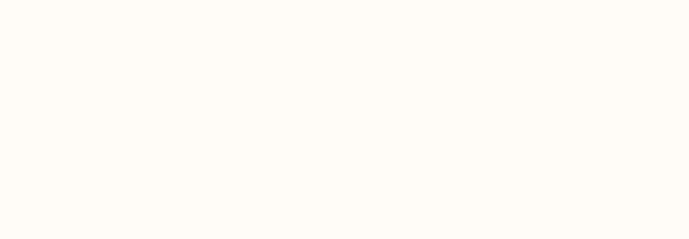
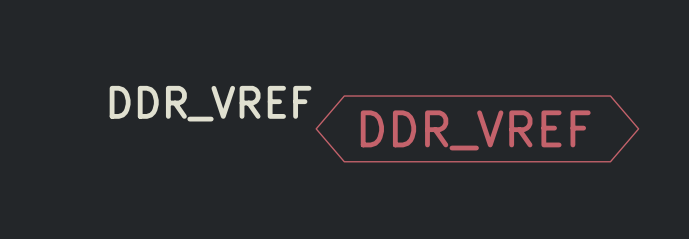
label: none -> DDR_VREF (210, 103)
global label: none -> DDR_VREF (475, 130)

